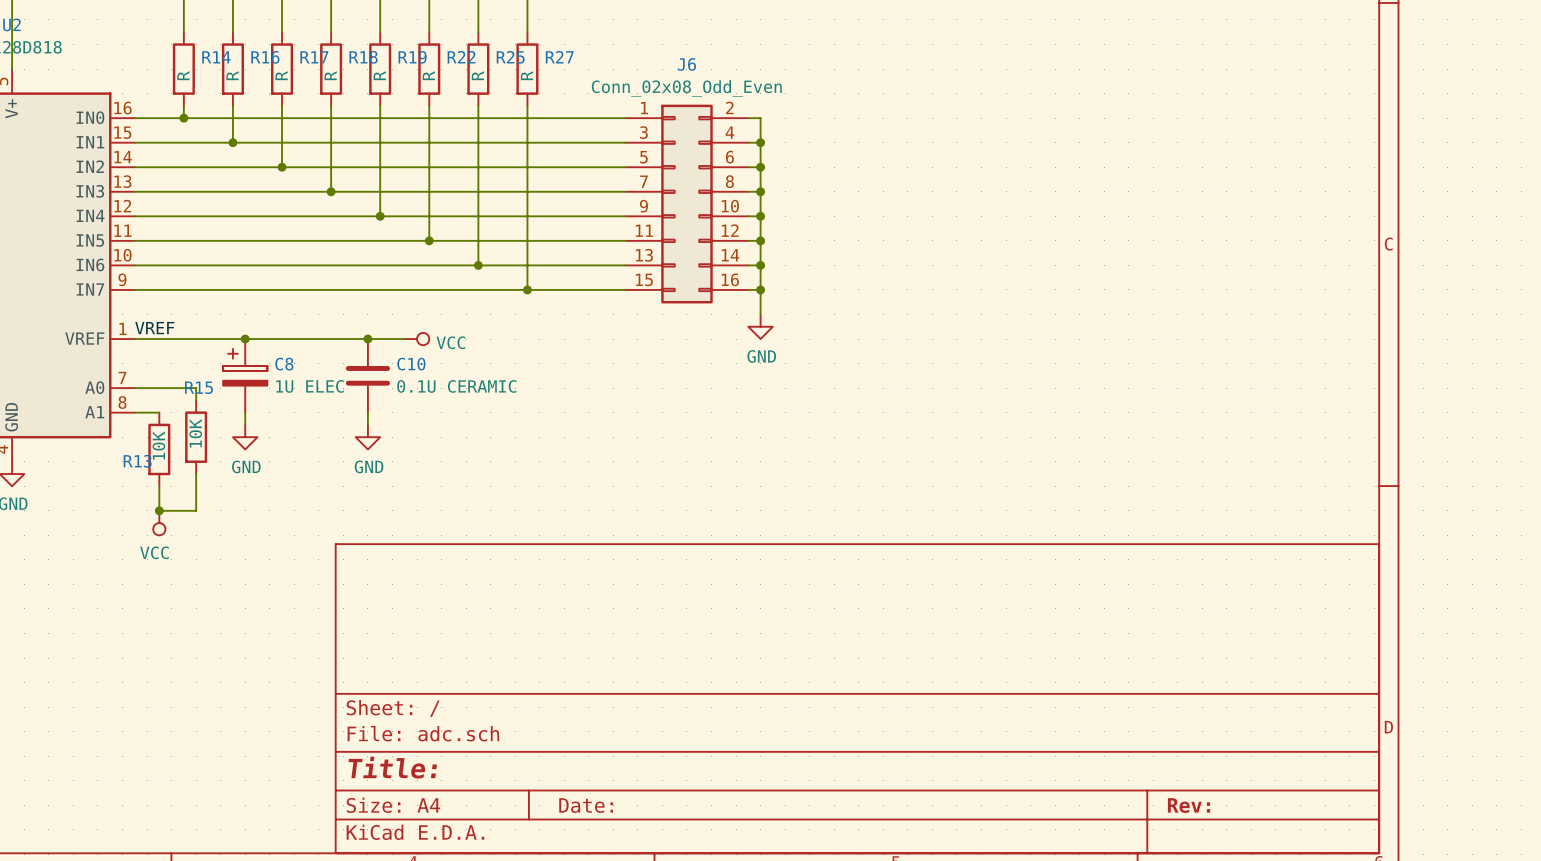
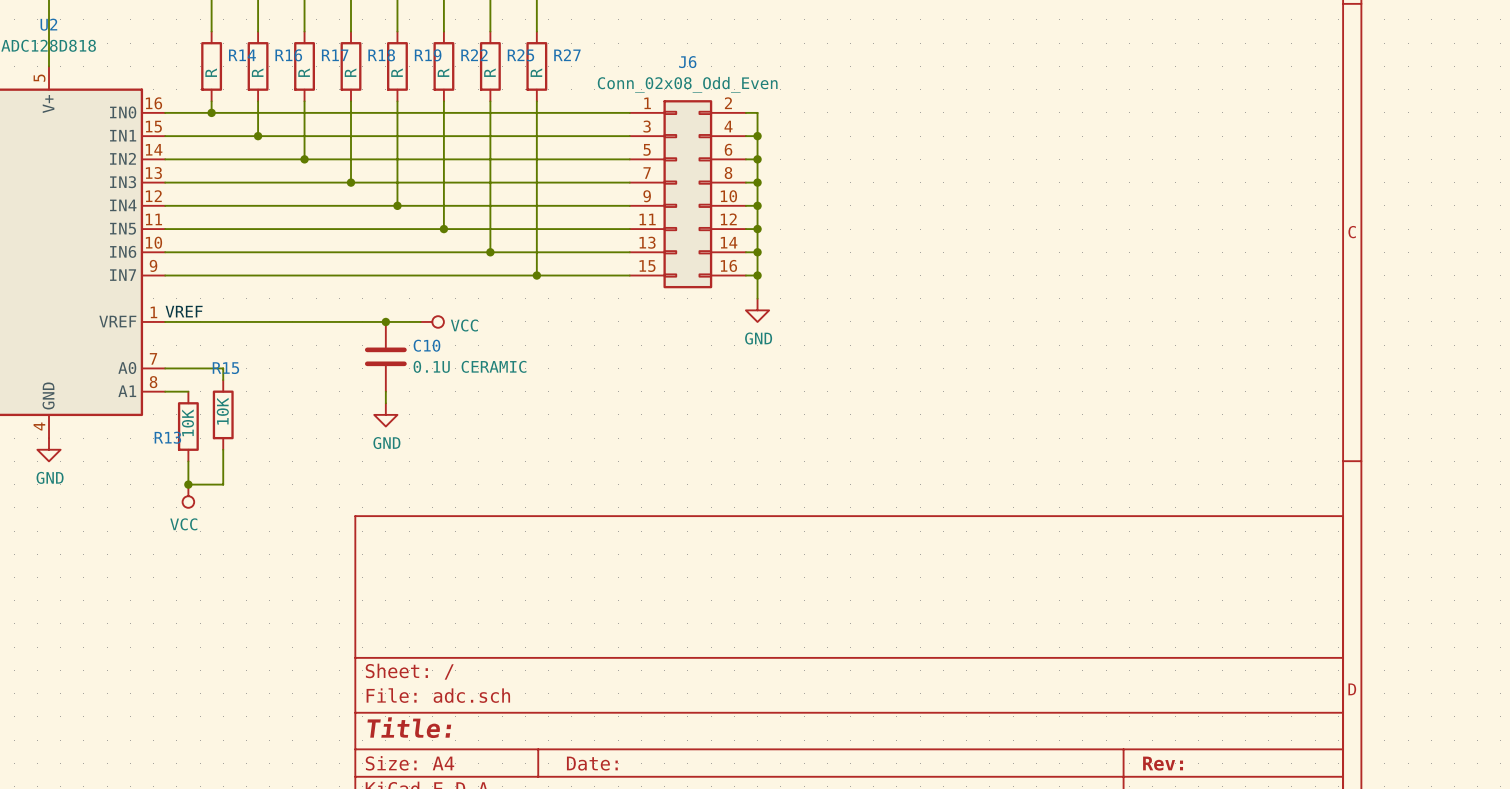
junction: (245, 339) -> none
C8: 1U ELEC (245, 375) -> none
wire: (245, 412) (245, 424) -> none
power symbol: GND (245, 437) -> none

